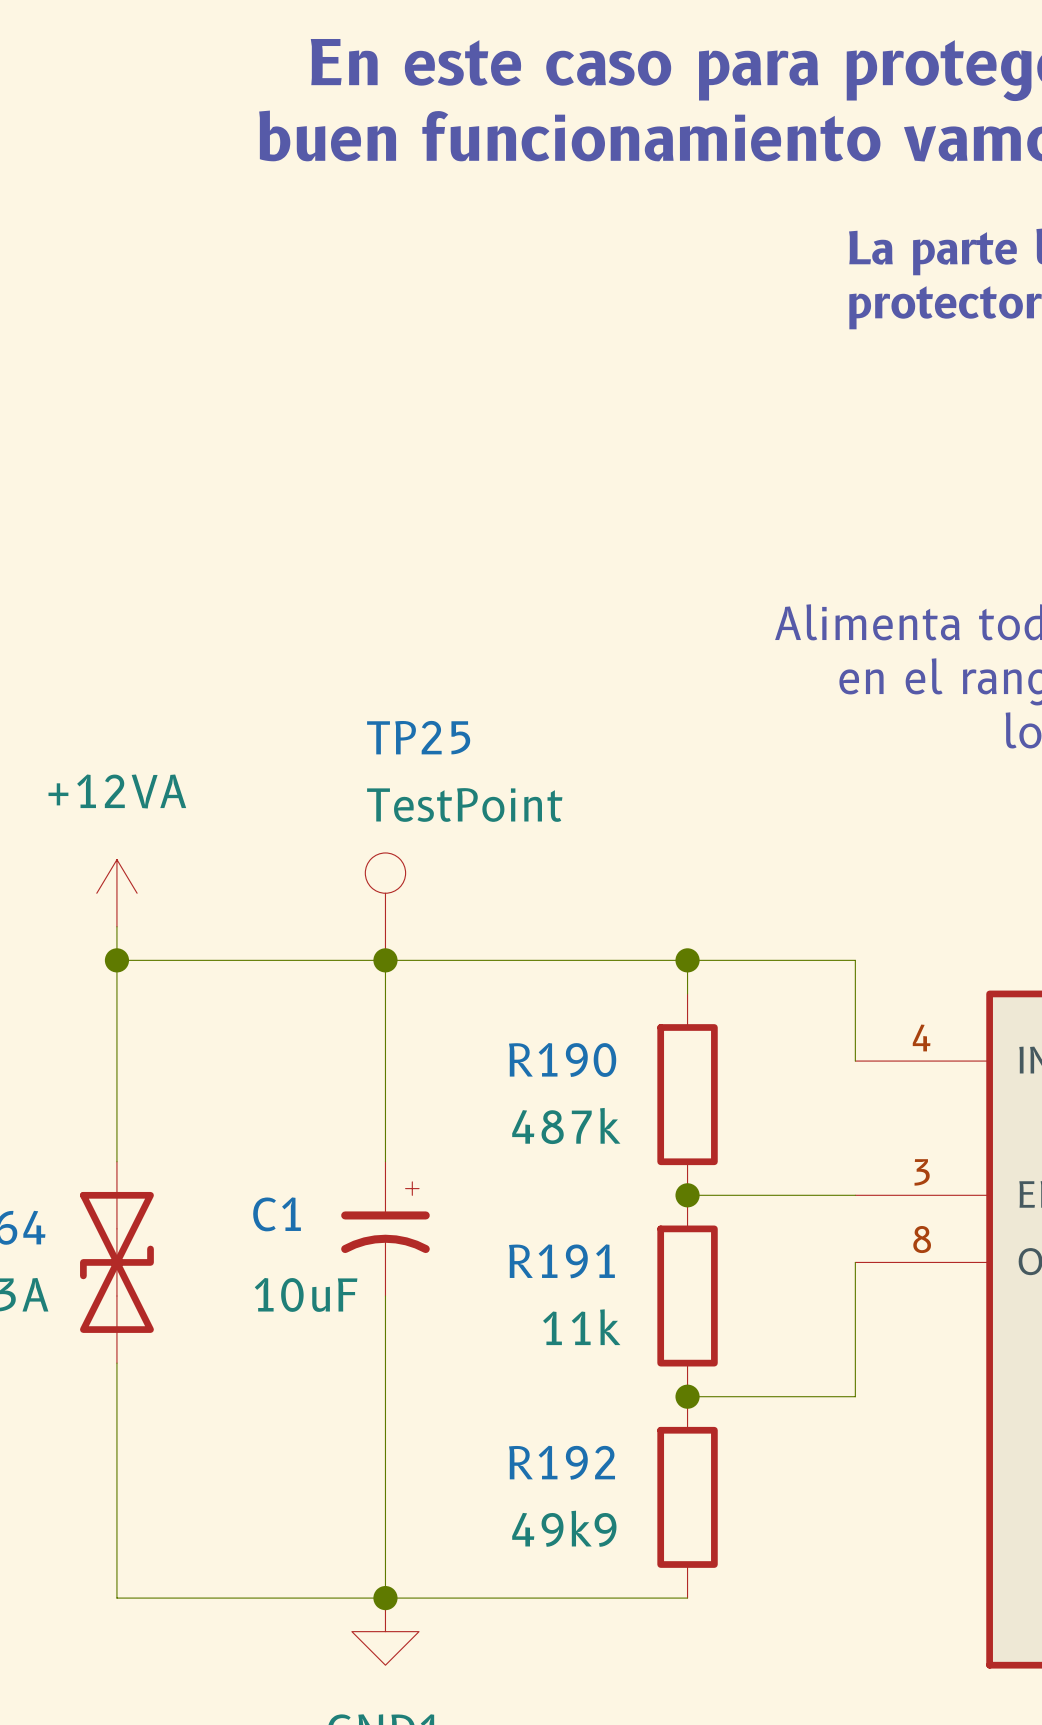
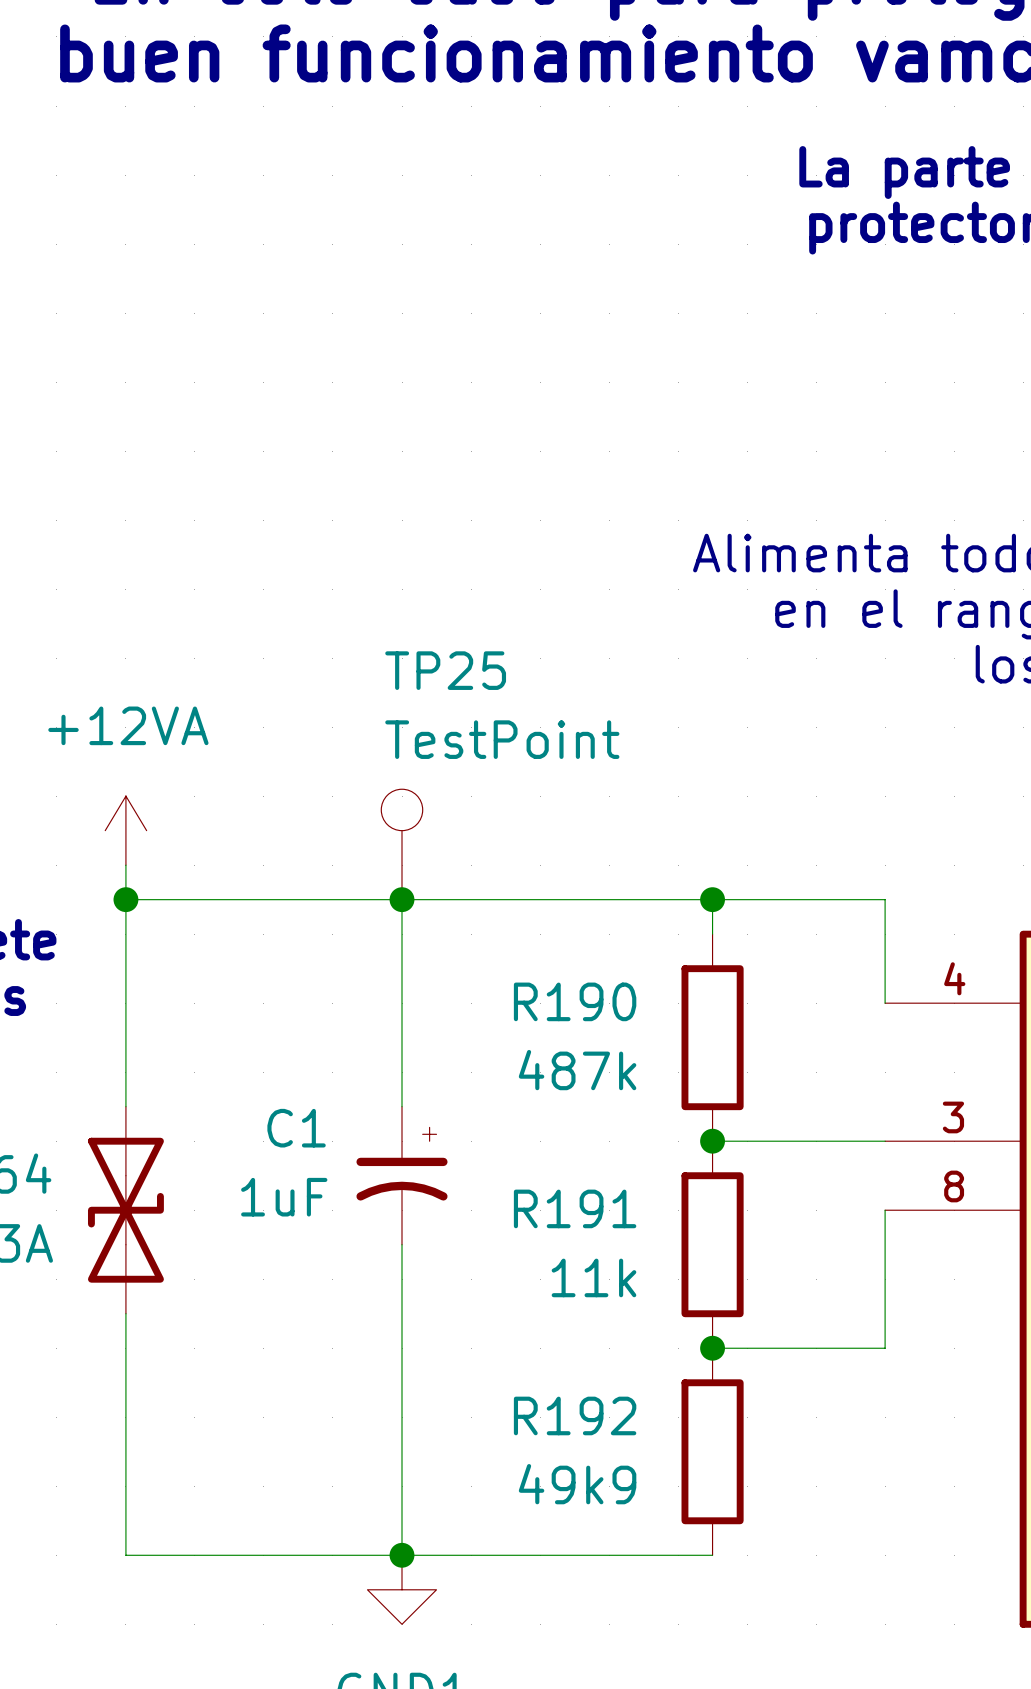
C1 name position: C1 (277, 1214) -> C1 (296, 1128)
C1 value: 10uF (306, 1294) -> 1uF (284, 1197)

